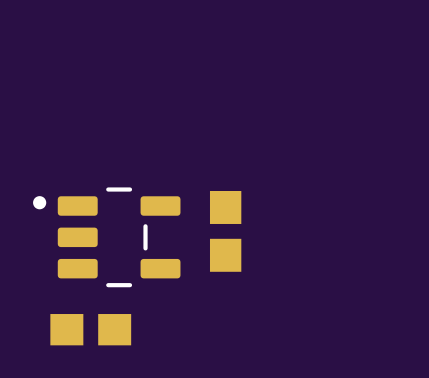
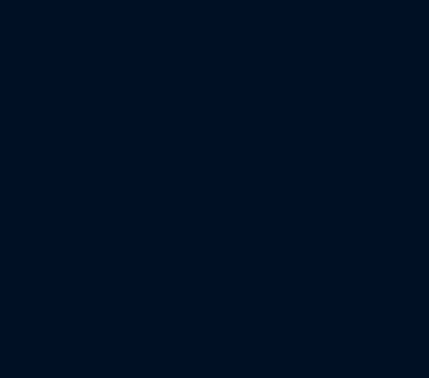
part: (225, 231) -> none
part: (106, 237) -> none
part: (90, 329) -> none

